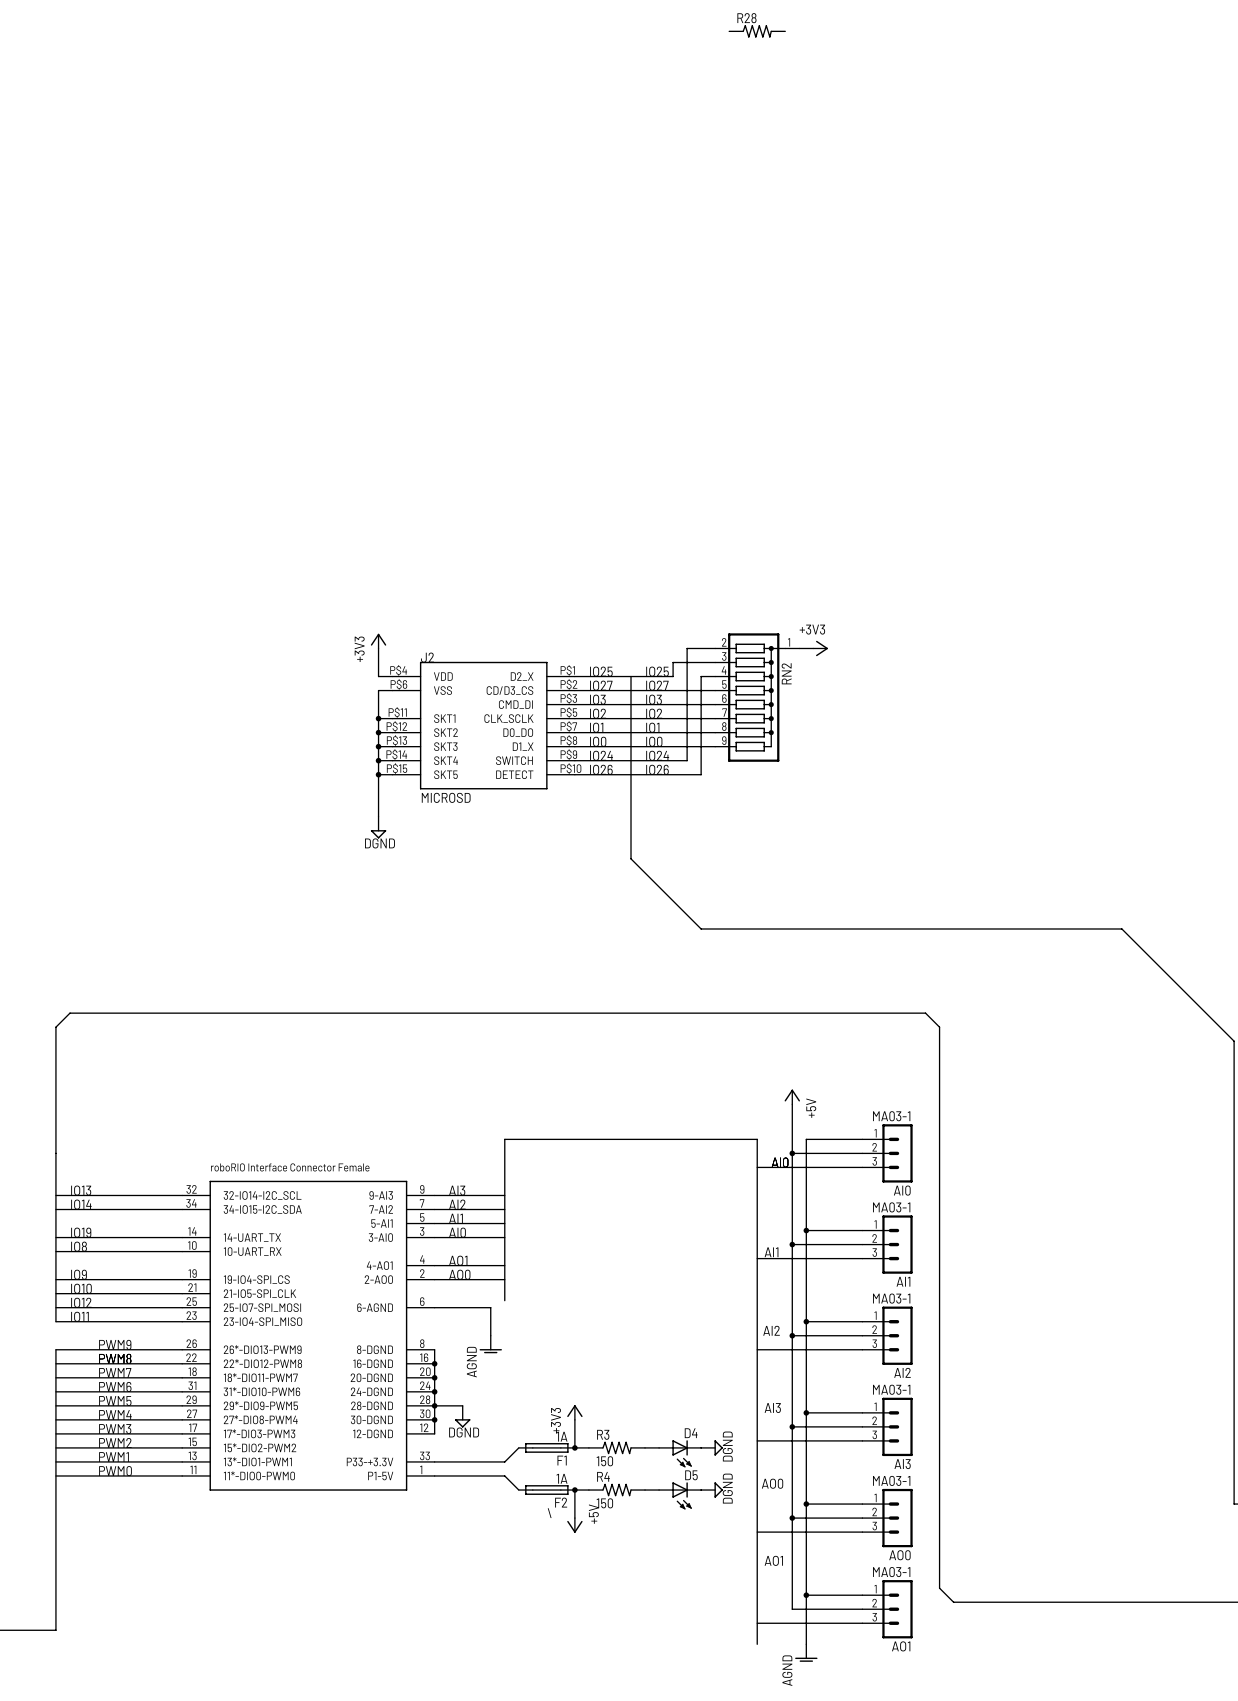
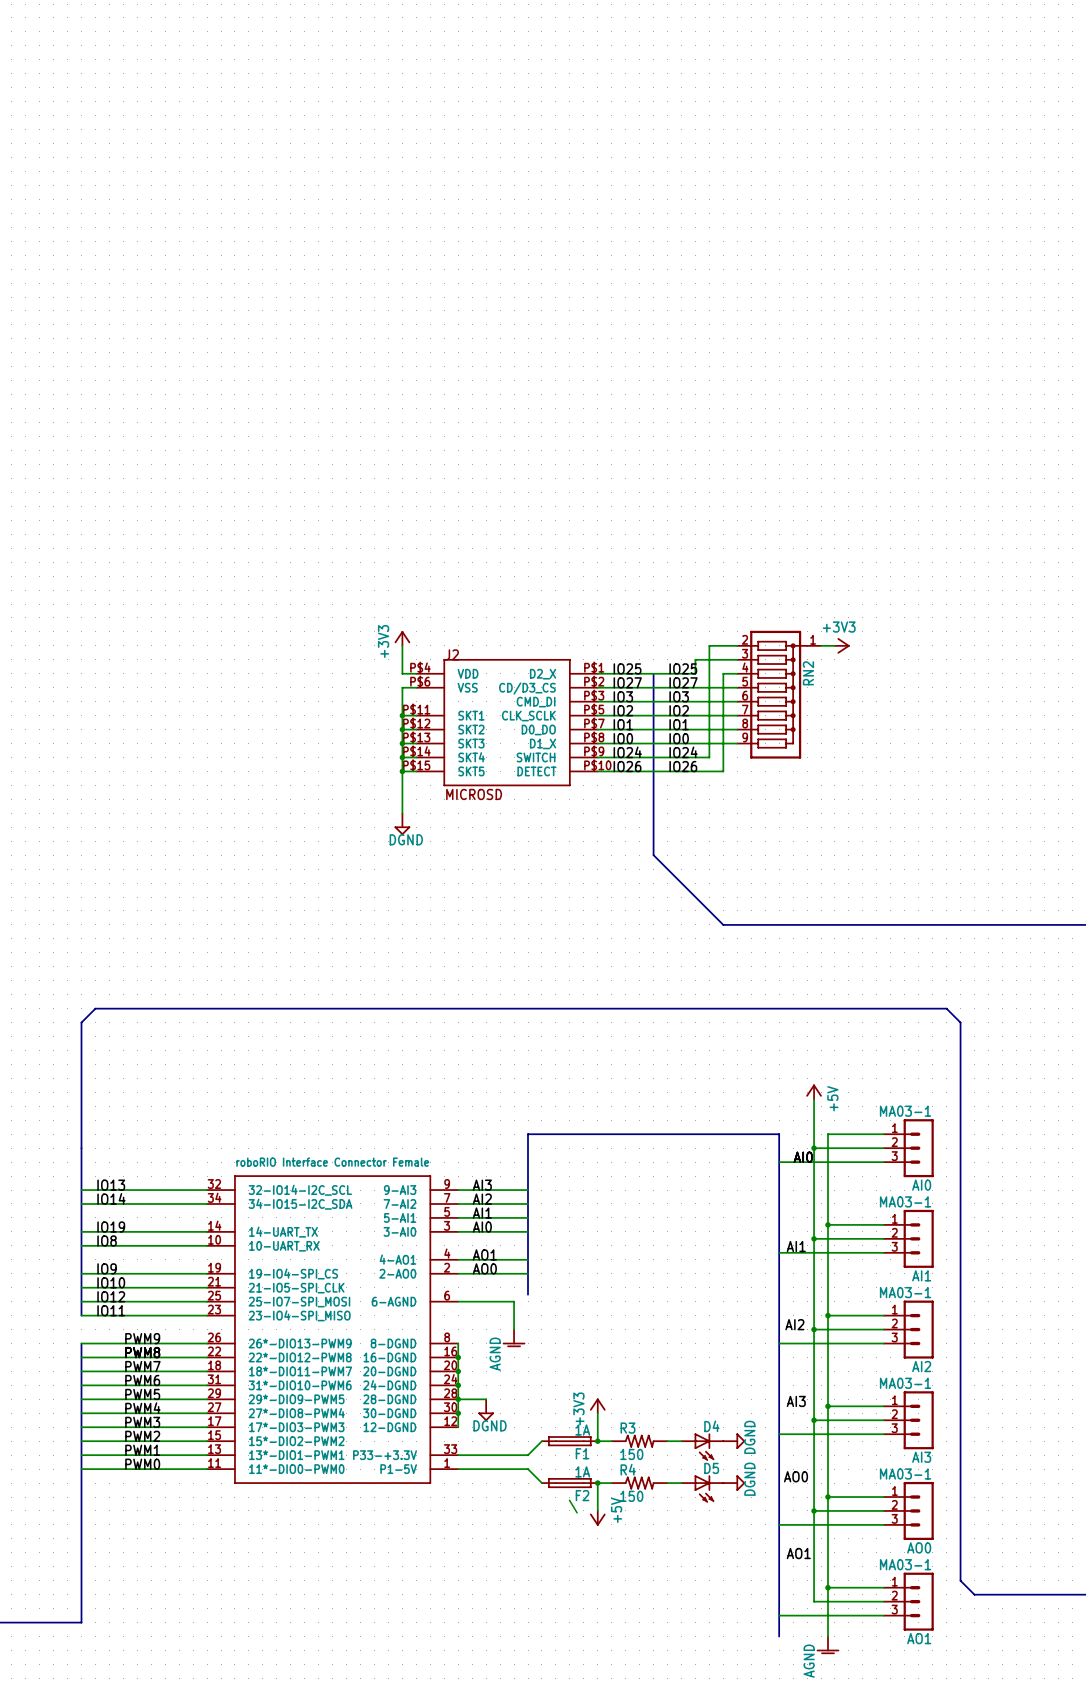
R28: (757, 31) -> none

